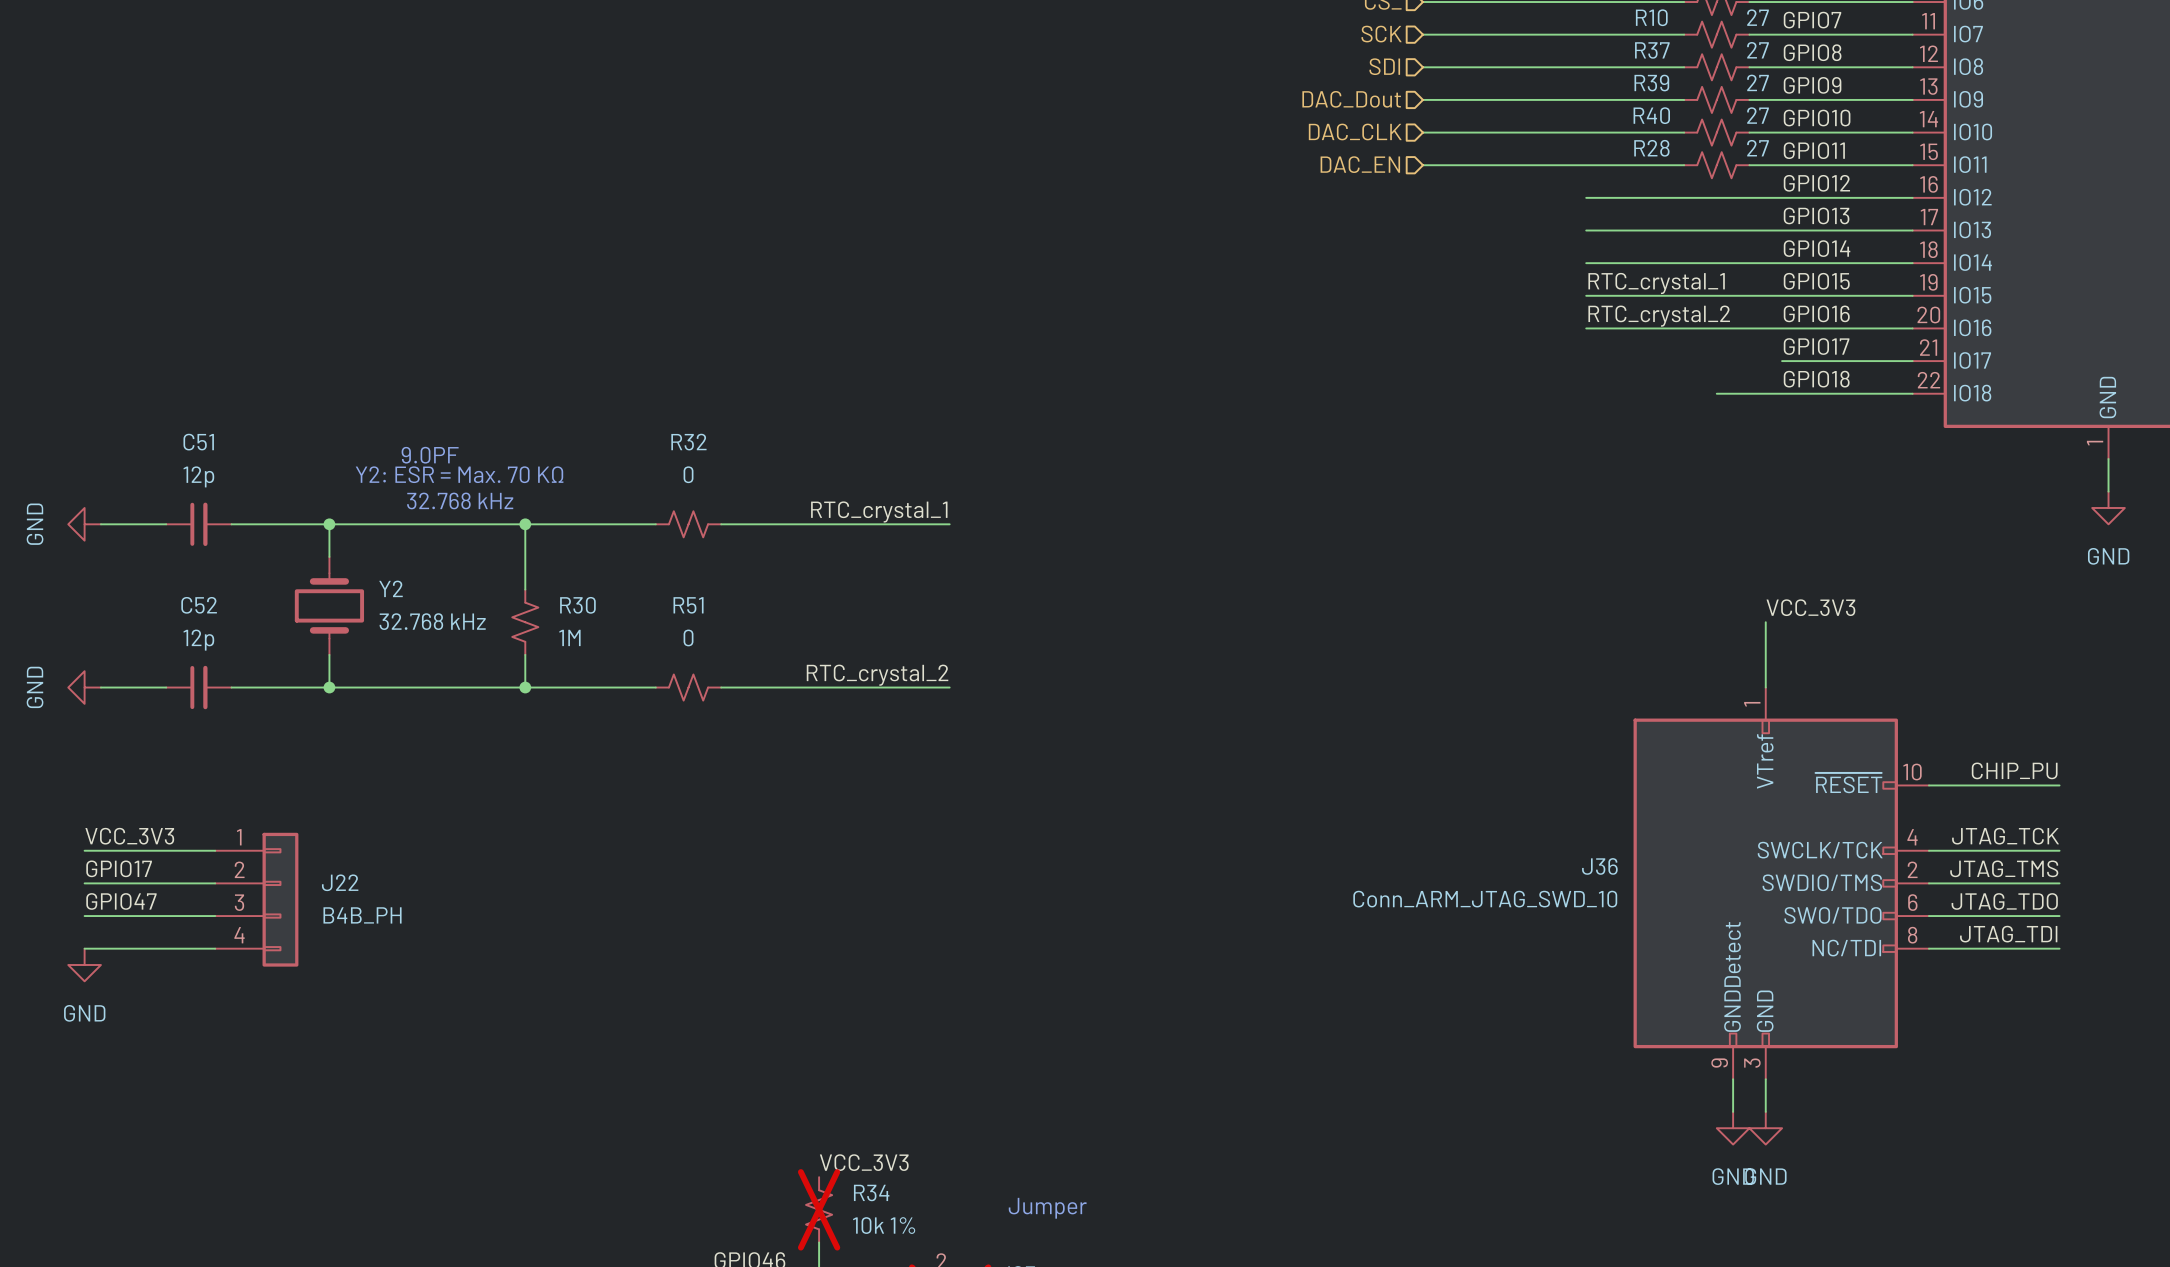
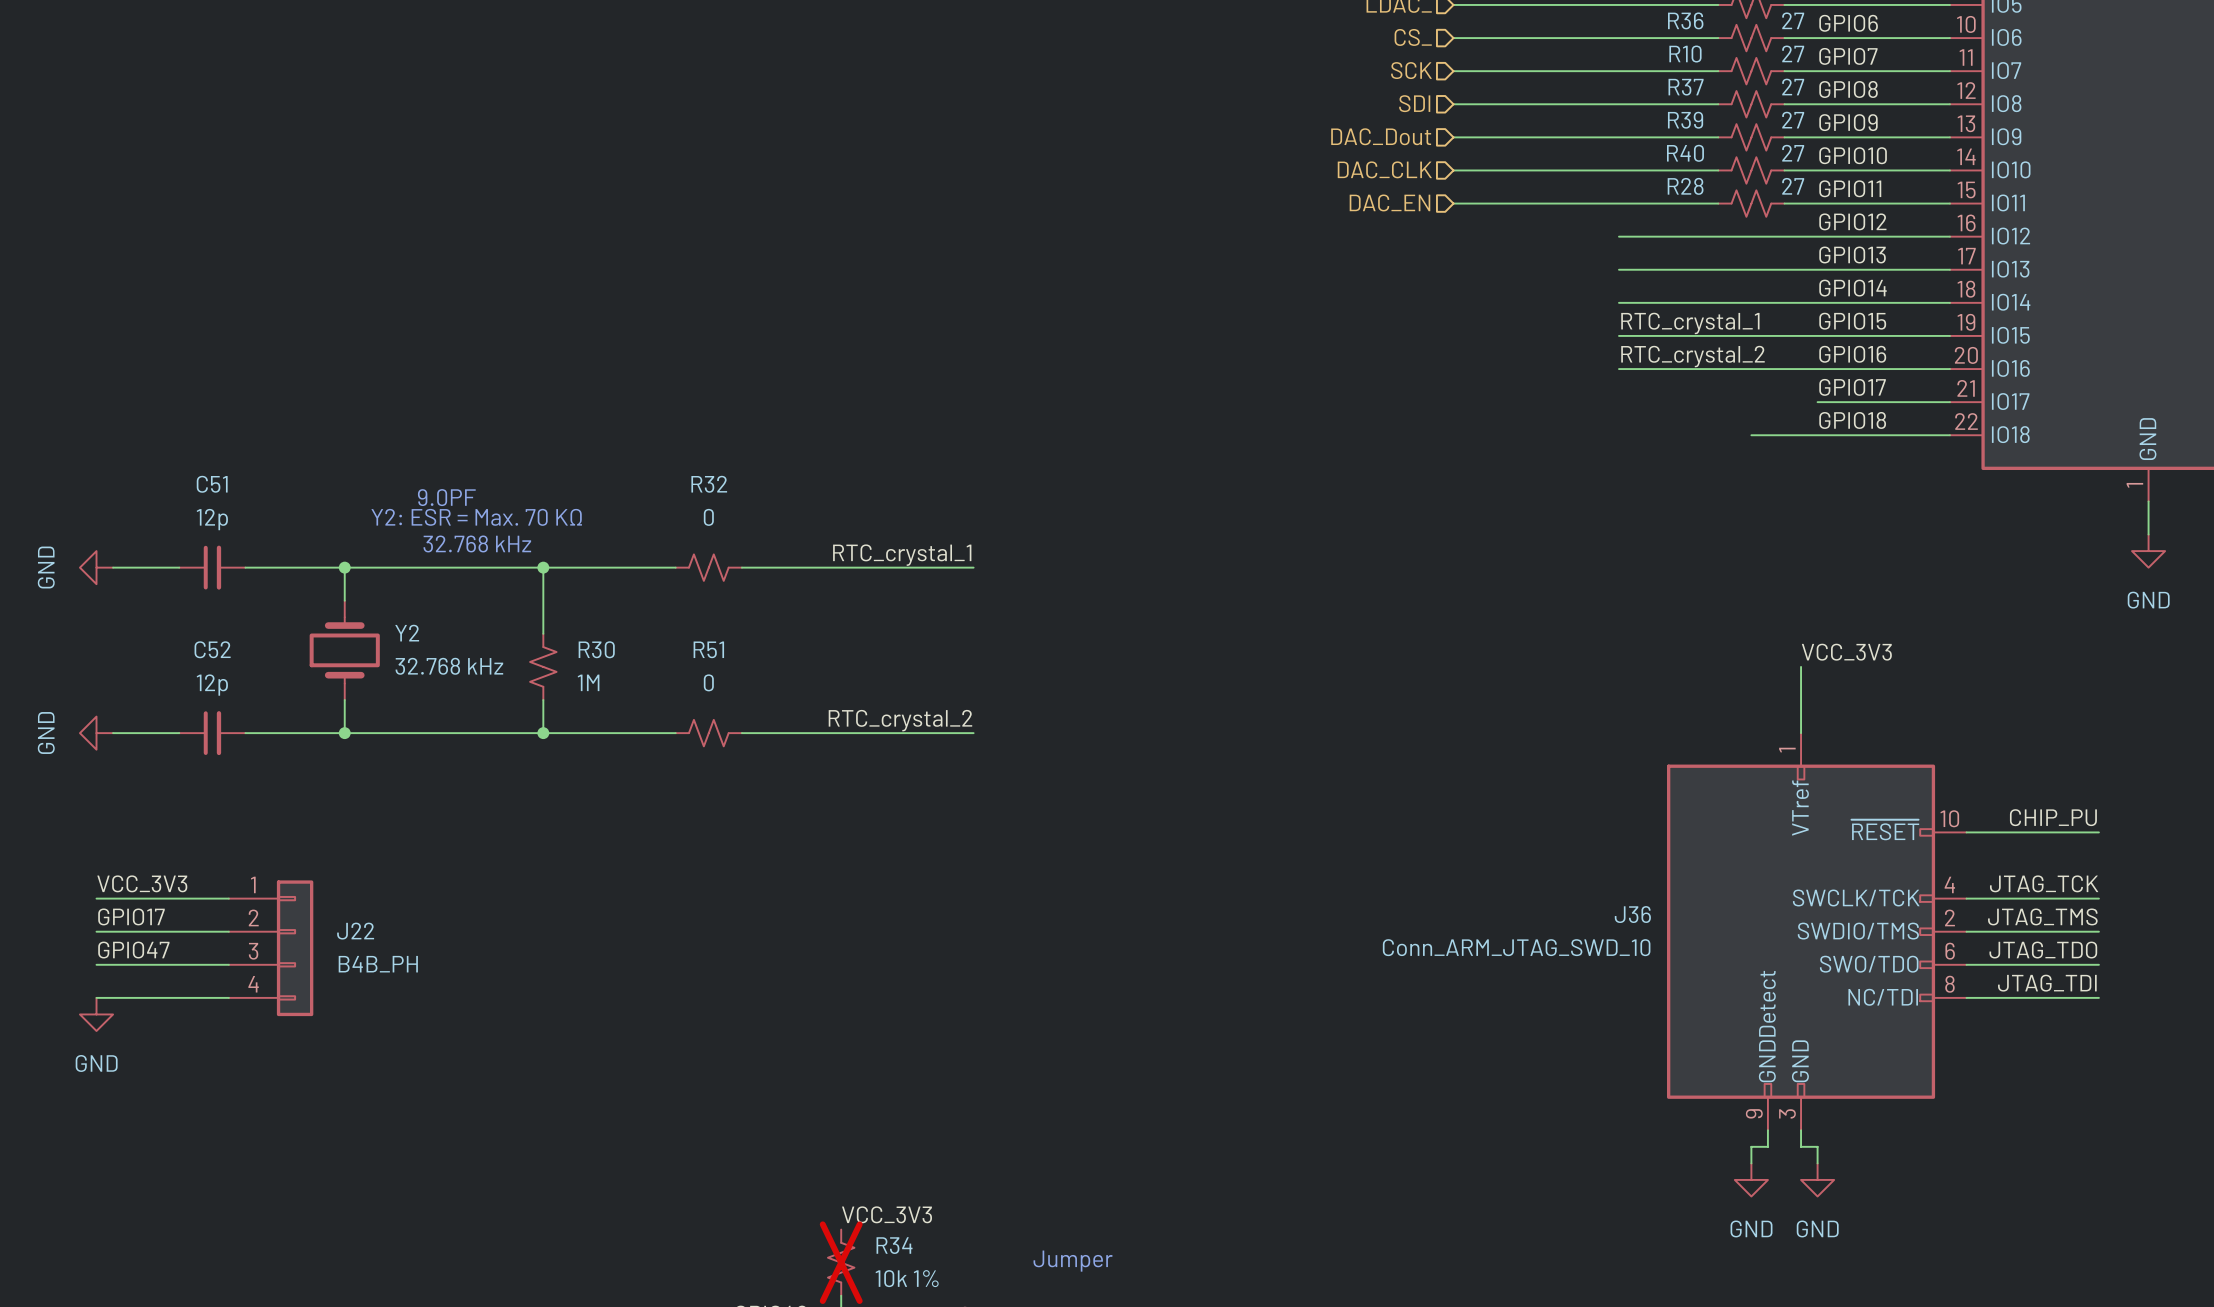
wire: (1733, 1095) (1733, 1111) -> (1767, 1146) (1751, 1146) (1751, 1163)
wire: (1765, 1095) (1765, 1111) -> (1801, 1146) (1817, 1146) (1817, 1163)
power symbol position: GND (1733, 1128) -> GND (1751, 1179)
power symbol position: GND (1765, 1128) -> GND (1817, 1179)

